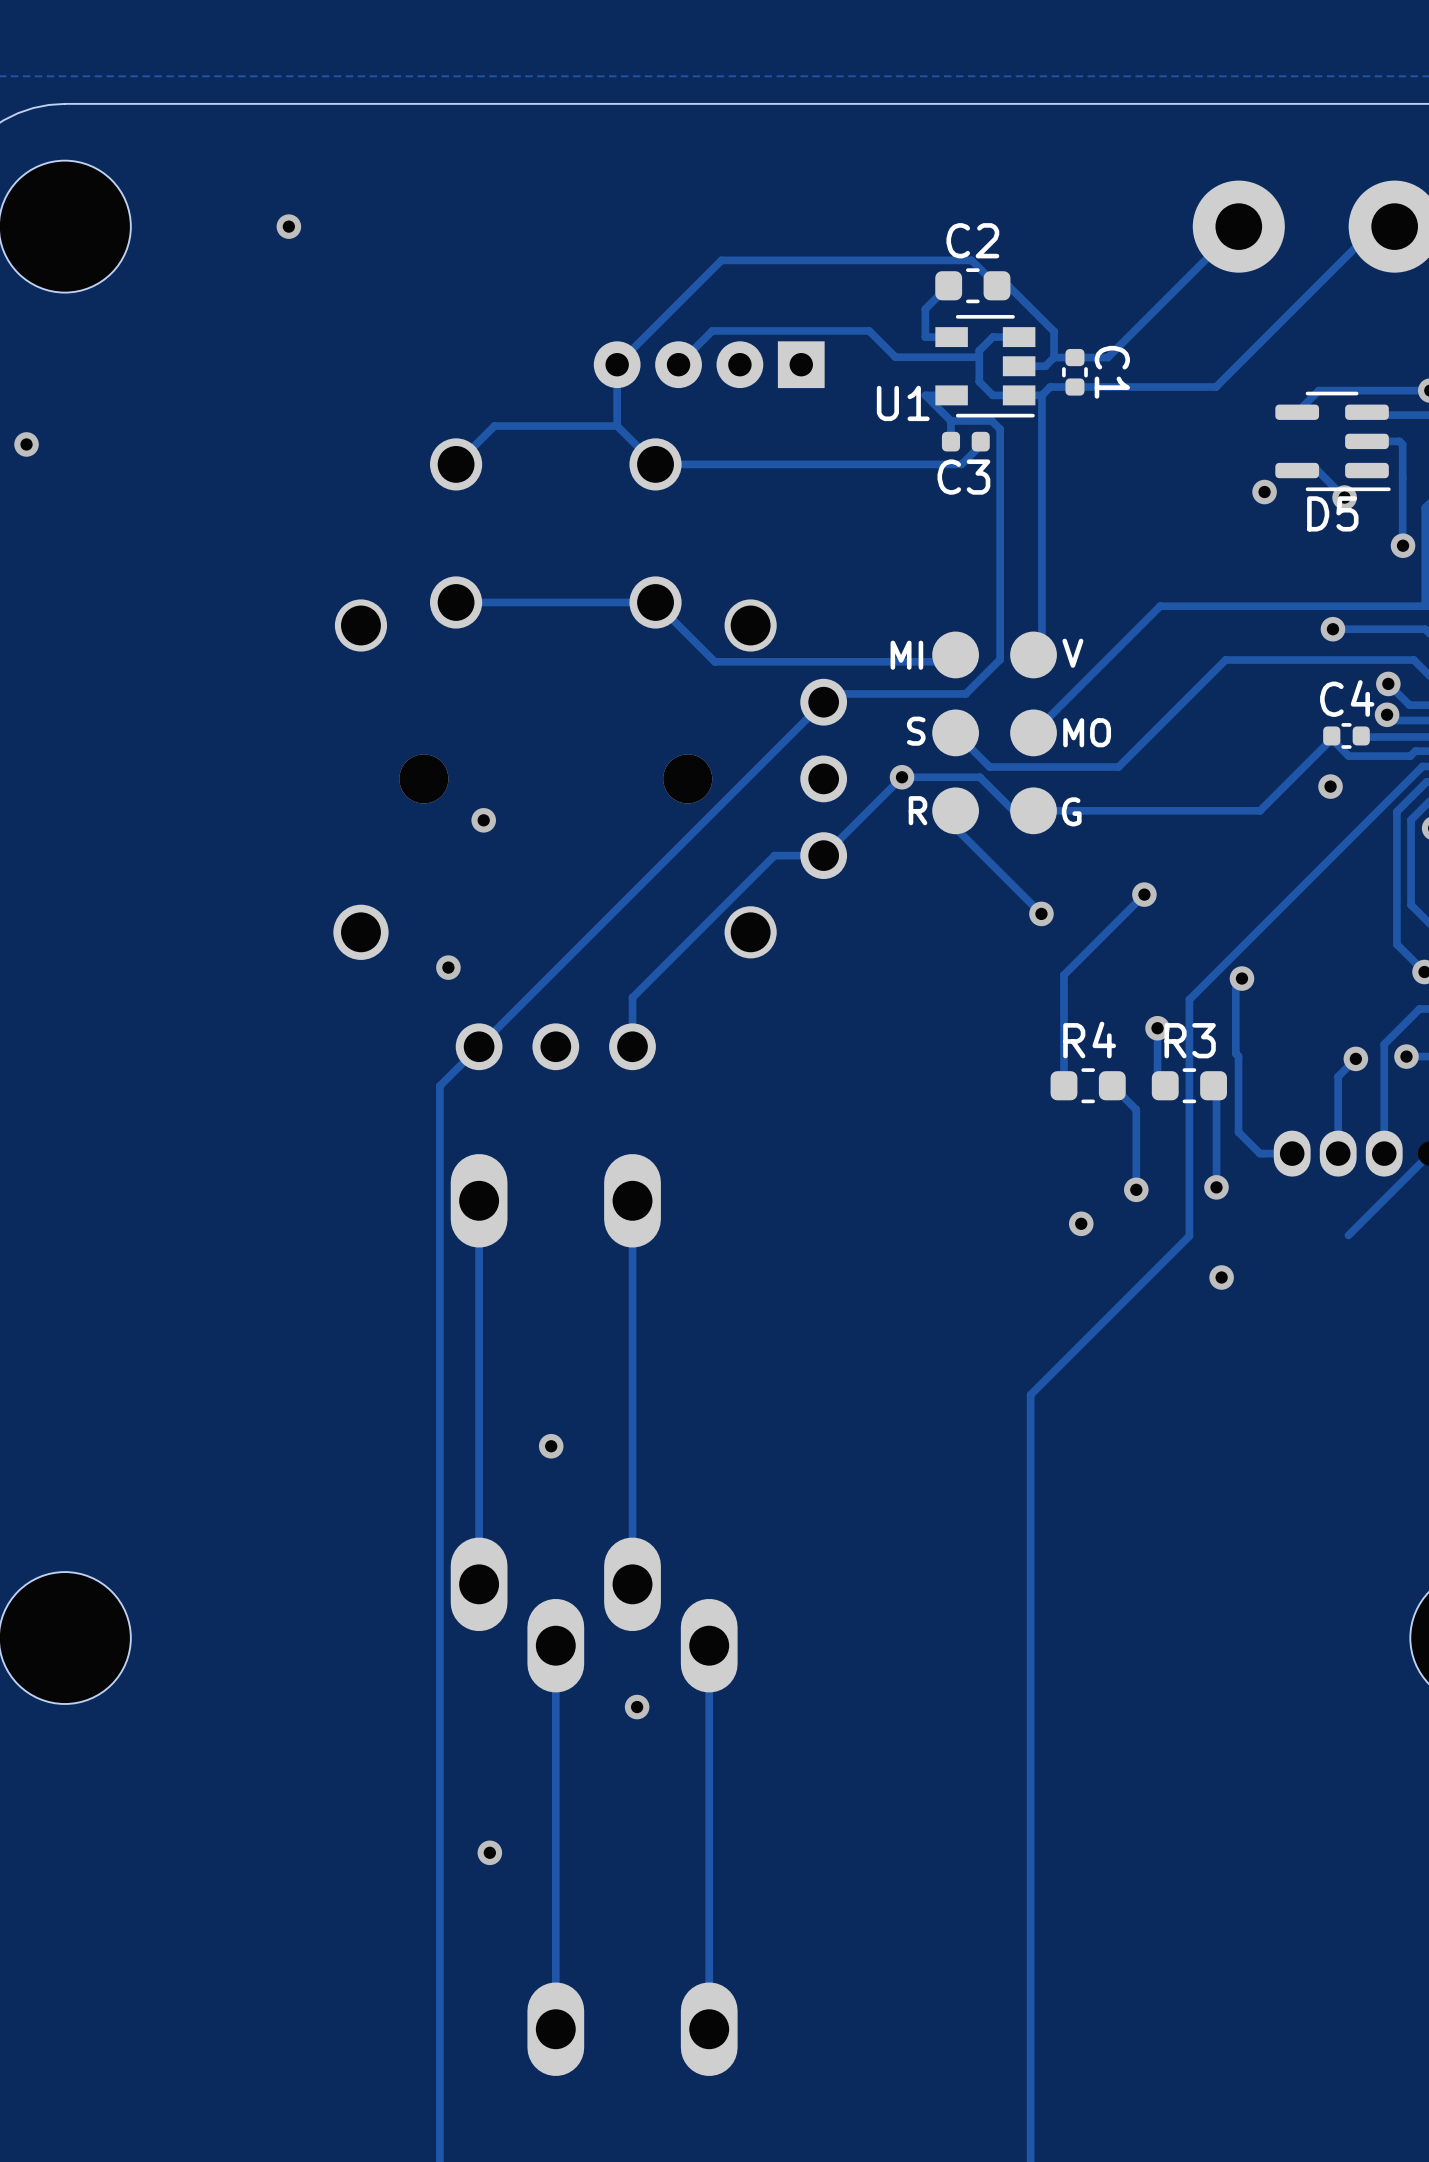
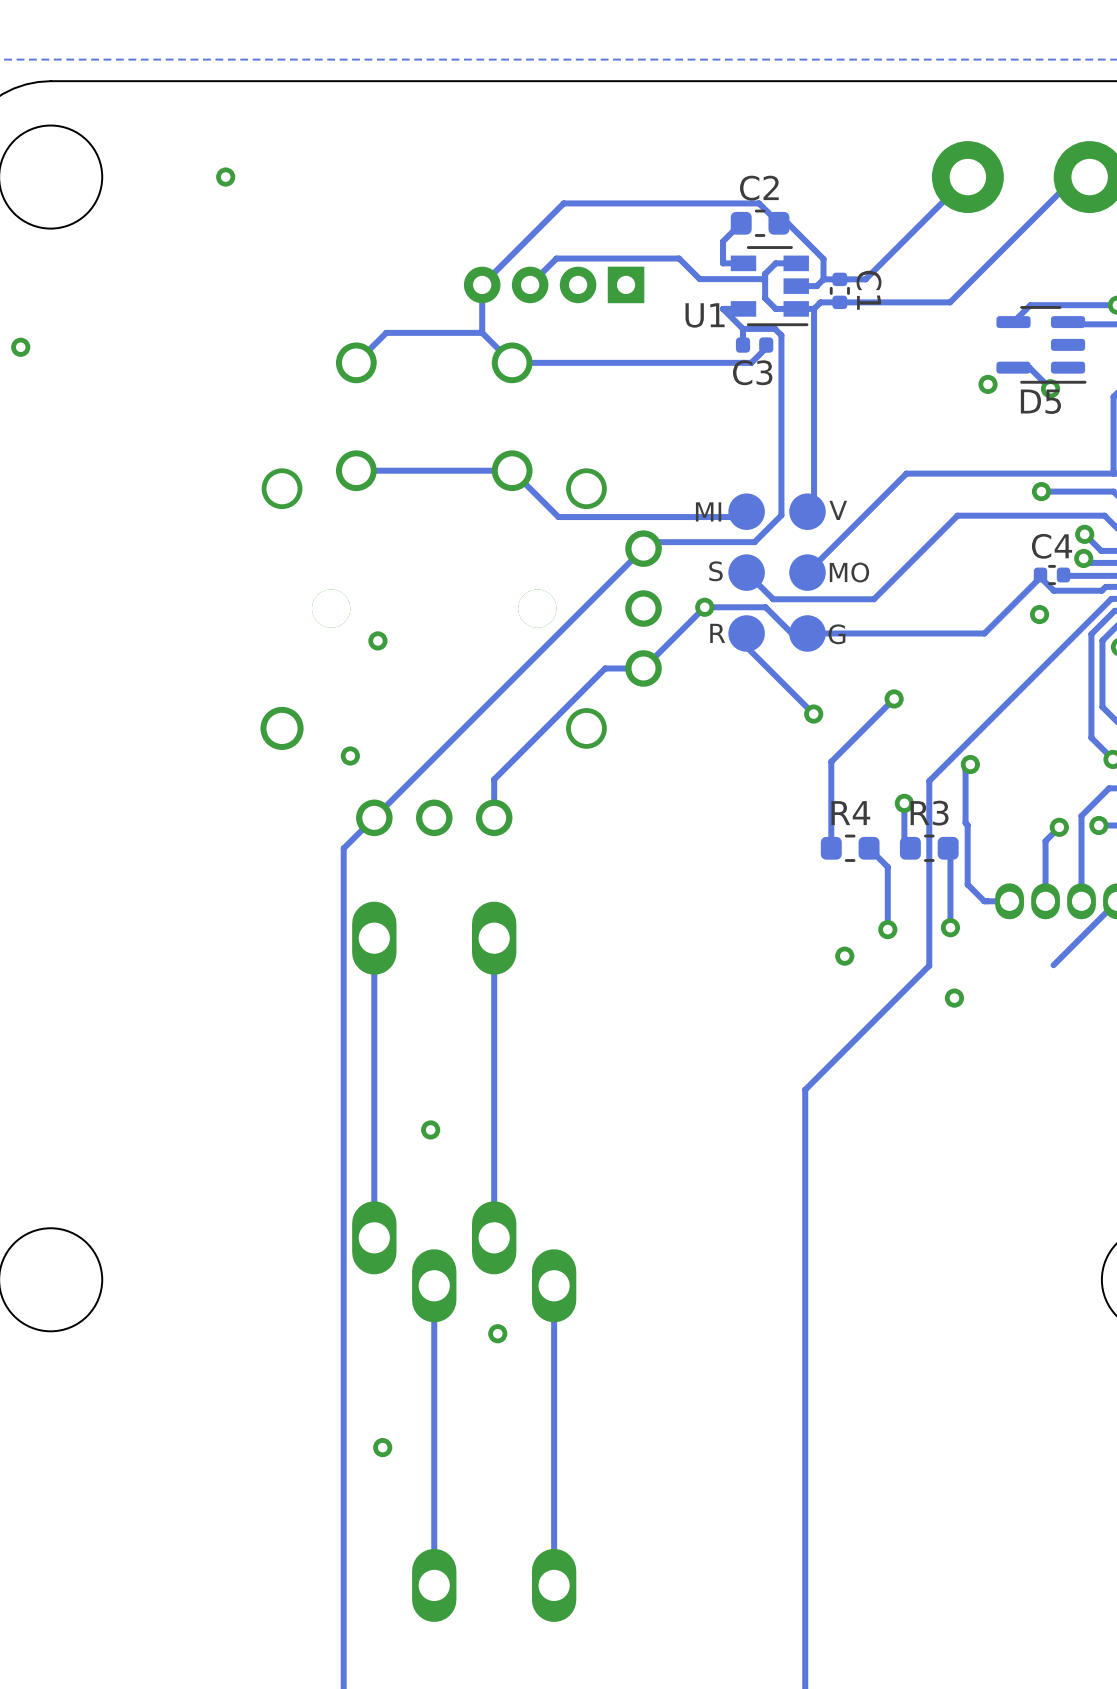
track: (1366, 441) (1399, 441) (1402, 444) (1402, 545) -> none
via: (1403, 545) -> none

